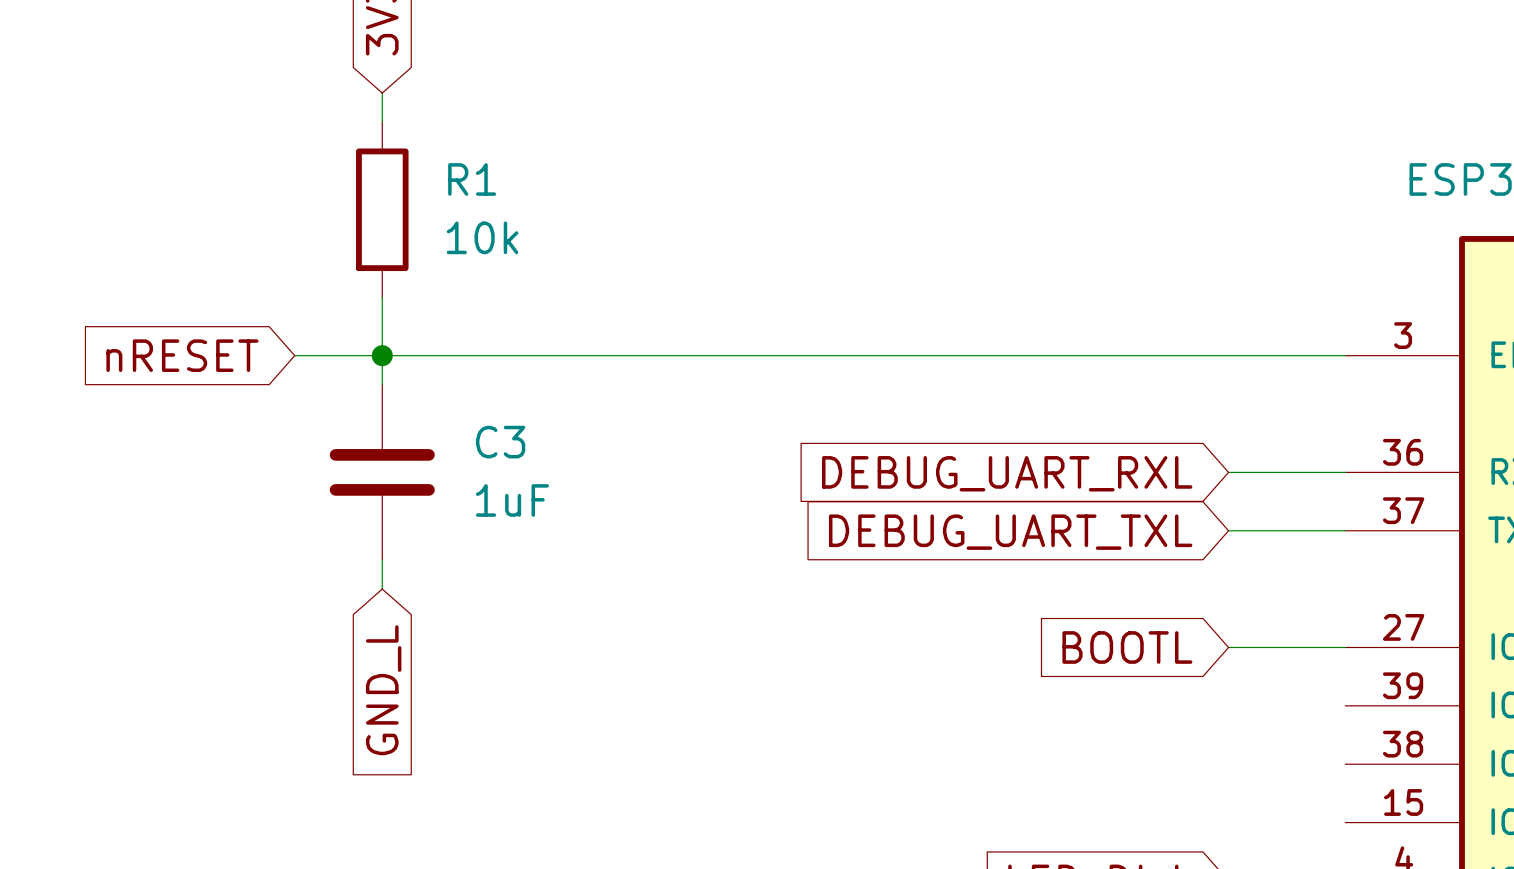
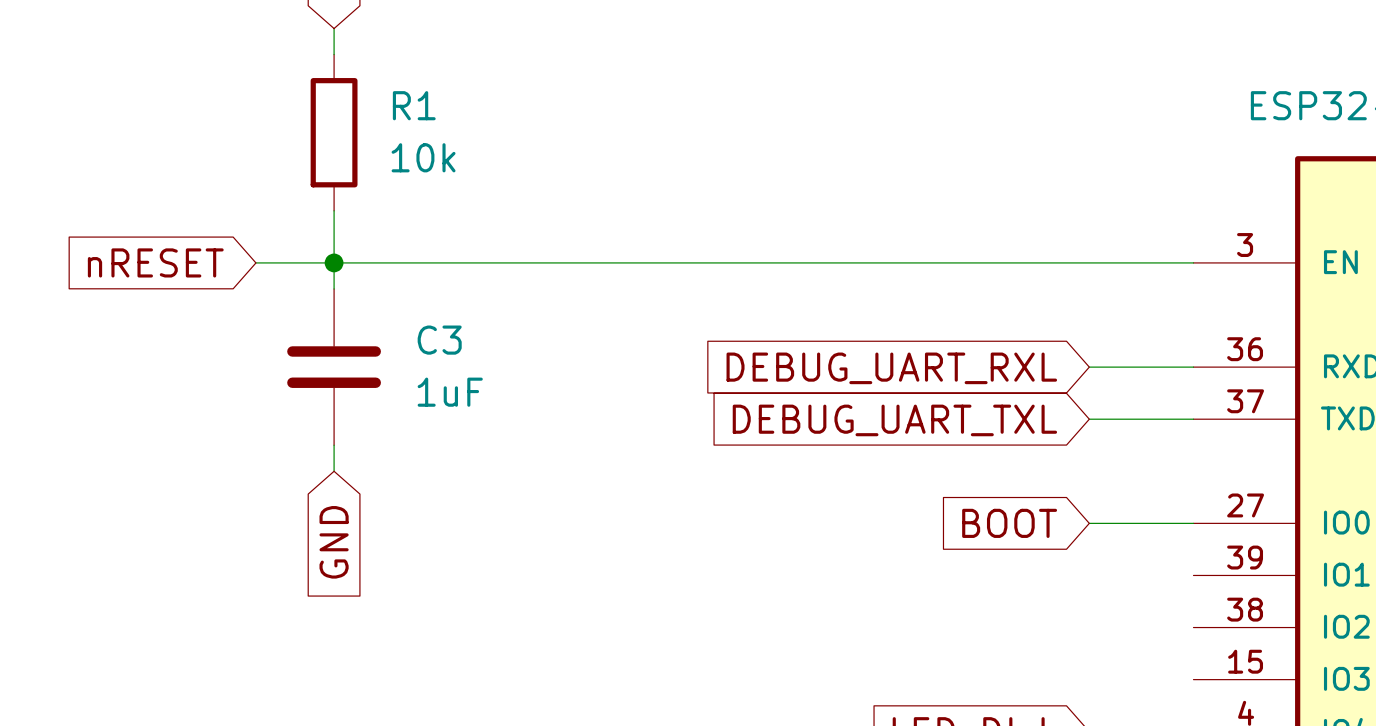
global label: BOOTL (1127, 647) -> BOOT (1009, 523)
global label: GND_L (383, 690) -> GND (334, 542)

